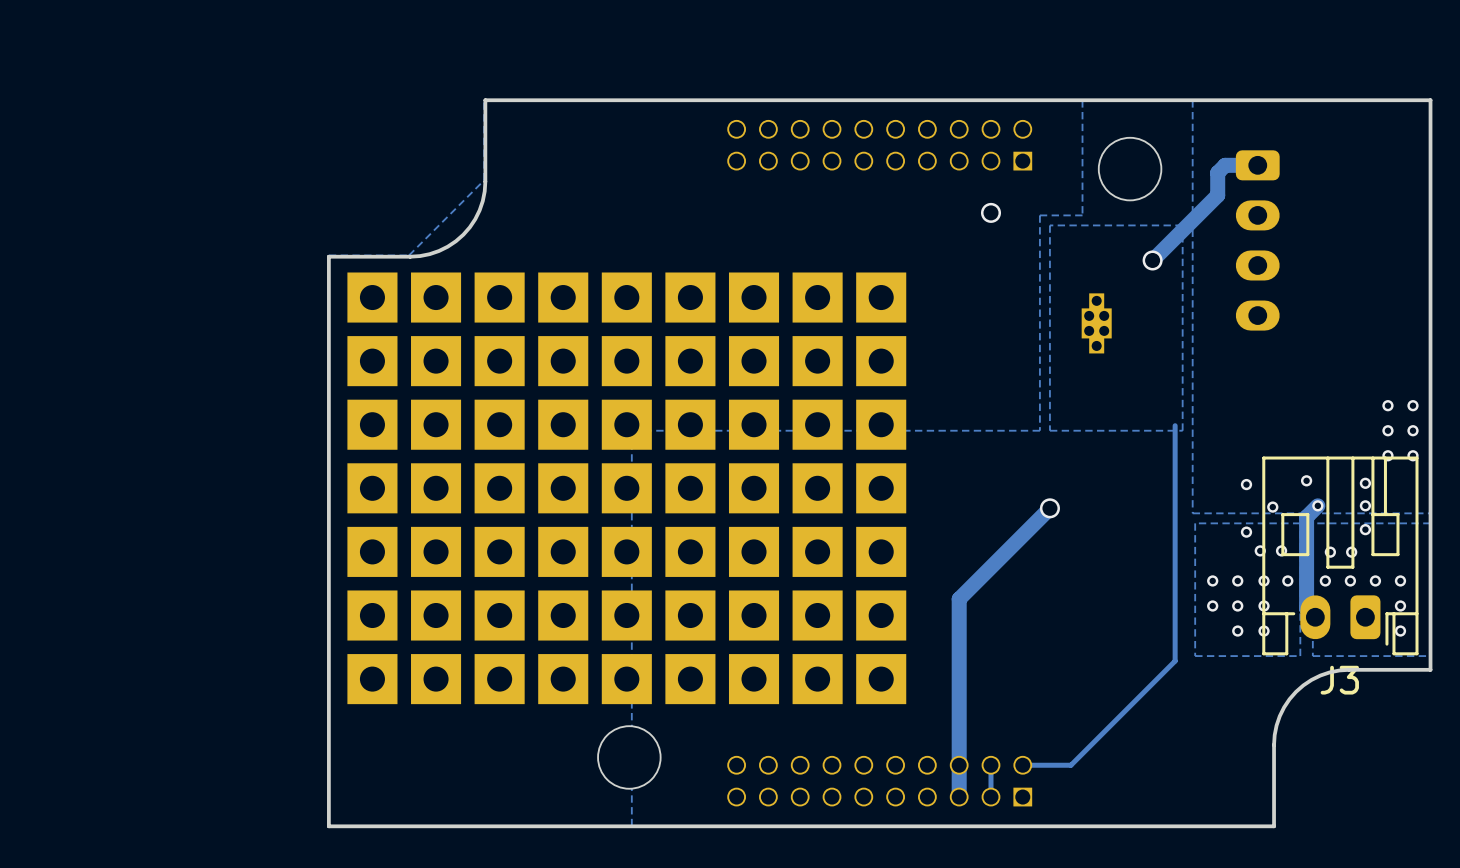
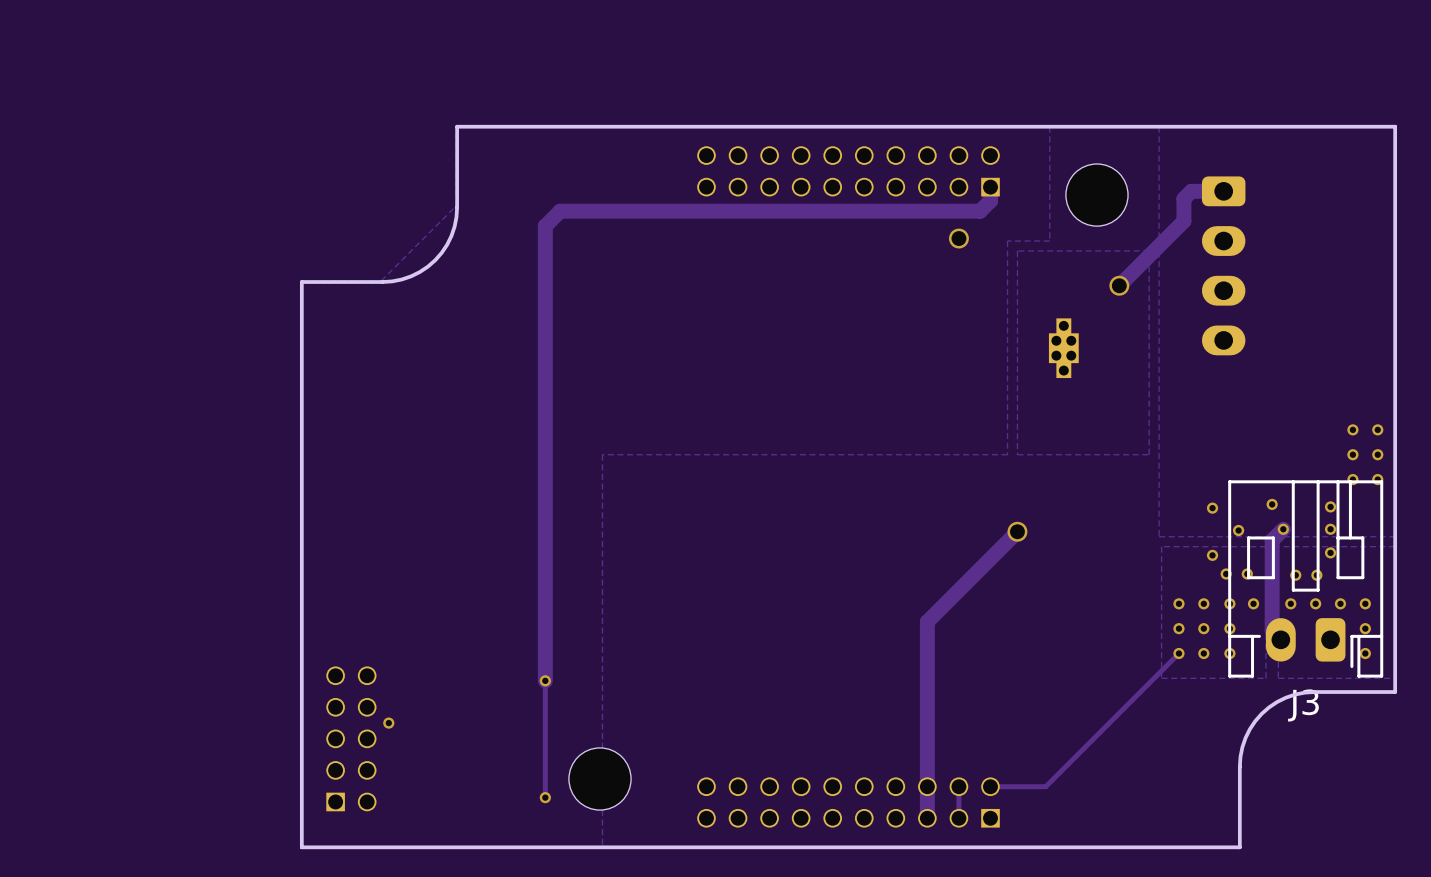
track: none -> (990, 187) (990, 200) (980, 211) (560, 211) (545, 226) (545, 797)
track: (1175, 425) (1175, 661) (1070, 765) -> (1178, 653) (1045, 786) (1038, 786)
part: (626, 488) -> none
via: none -> (1178, 653)
via: none -> (545, 680)
via: none -> (388, 723)
part: none -> (351, 738)
via: none -> (545, 797)

